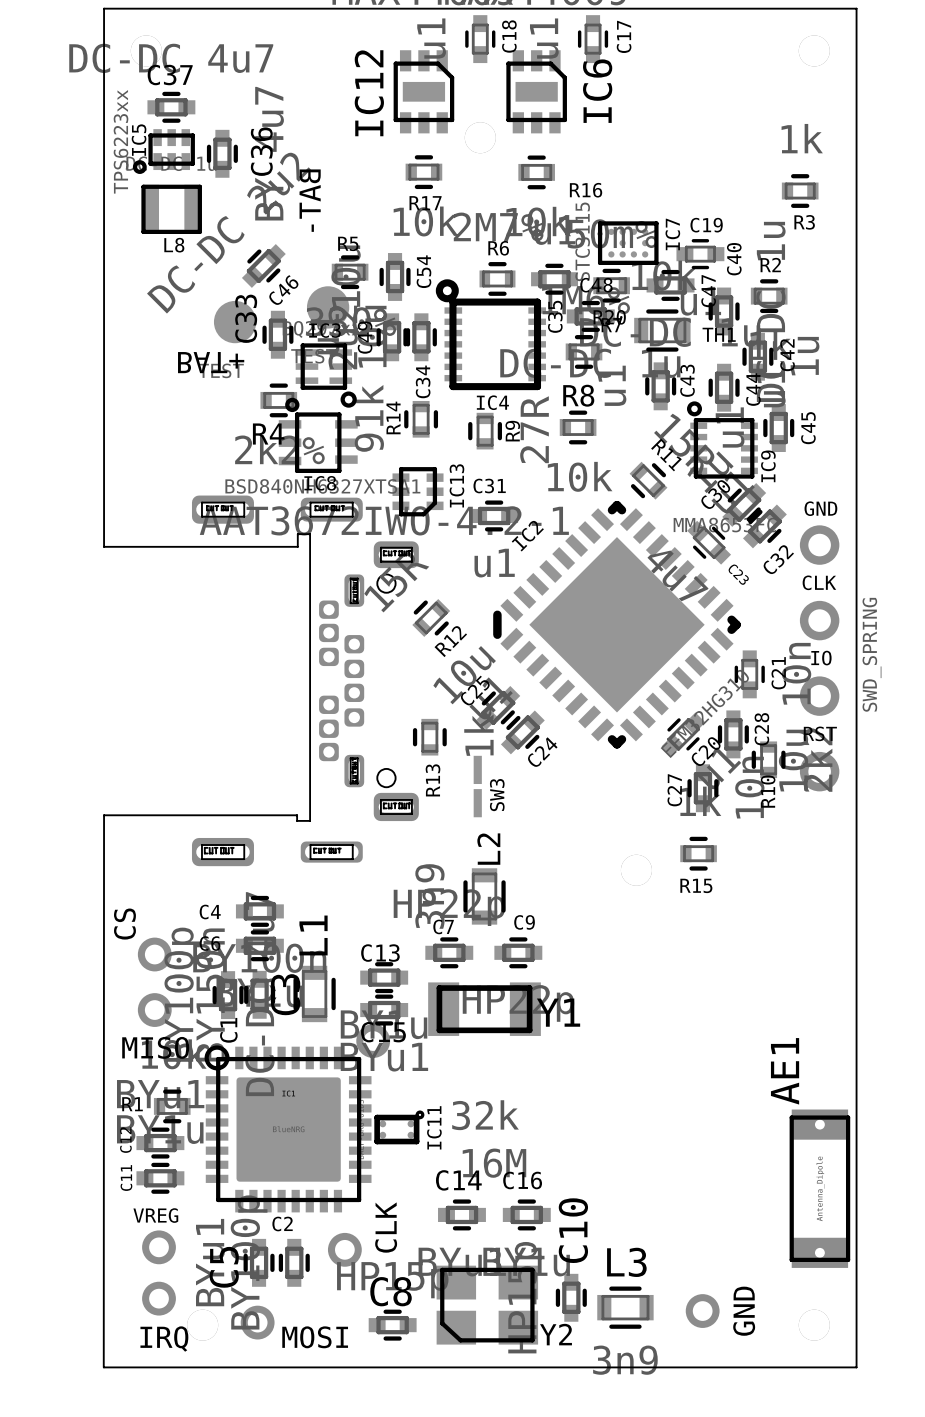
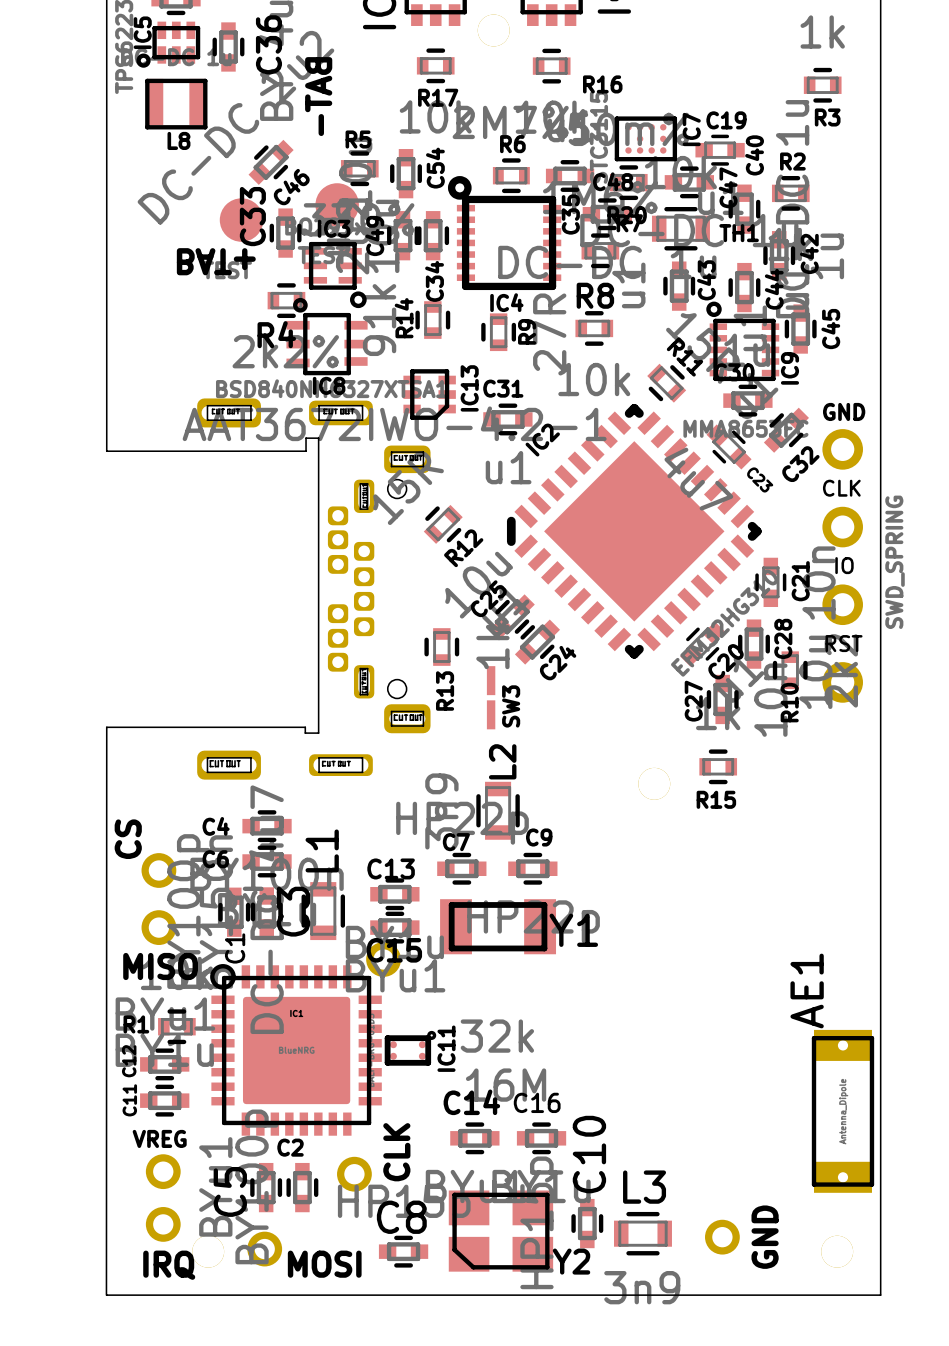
C30 rotation: 0° (744, 504) -> 45° clockwise (747, 400)

